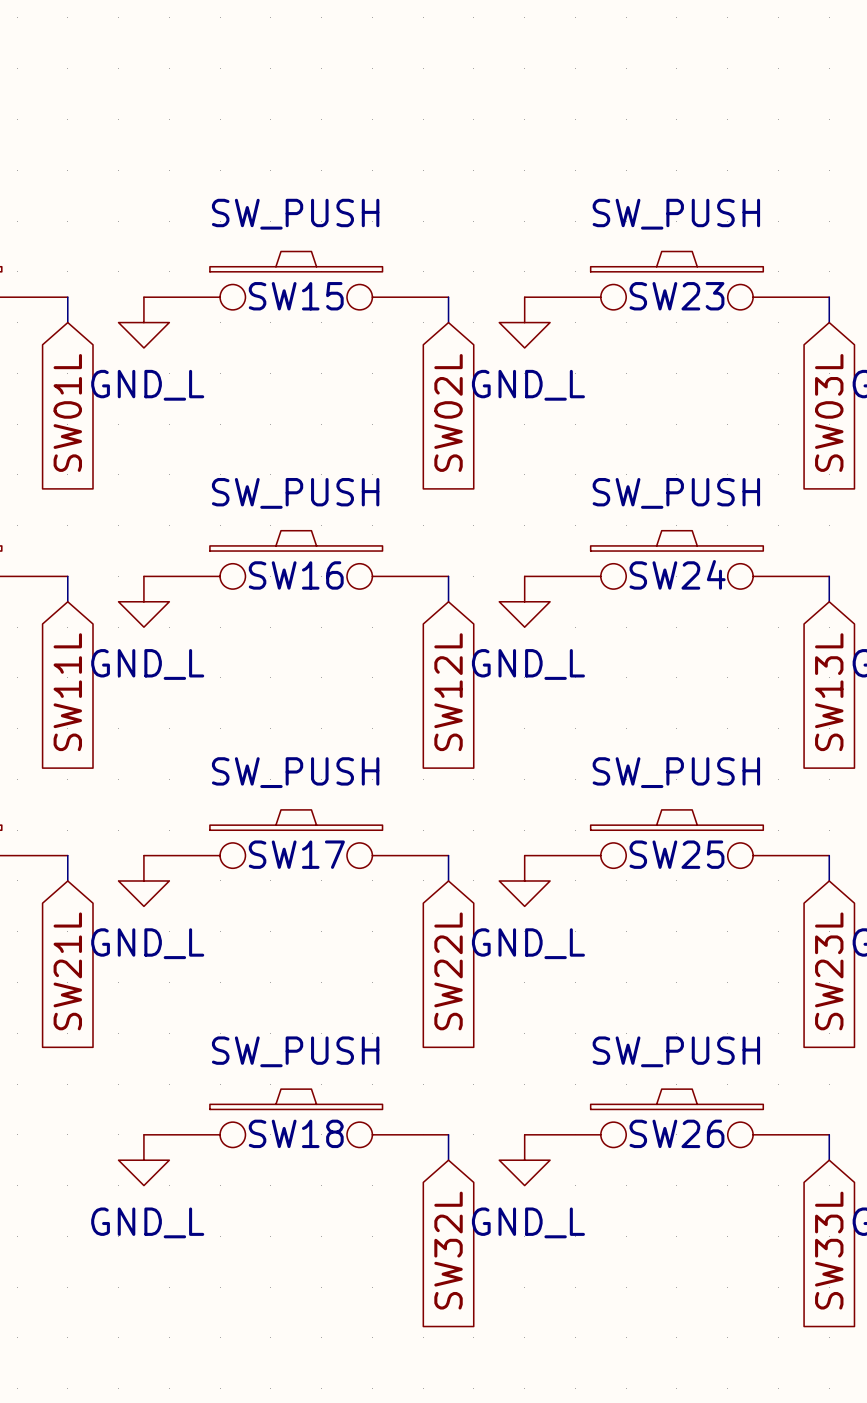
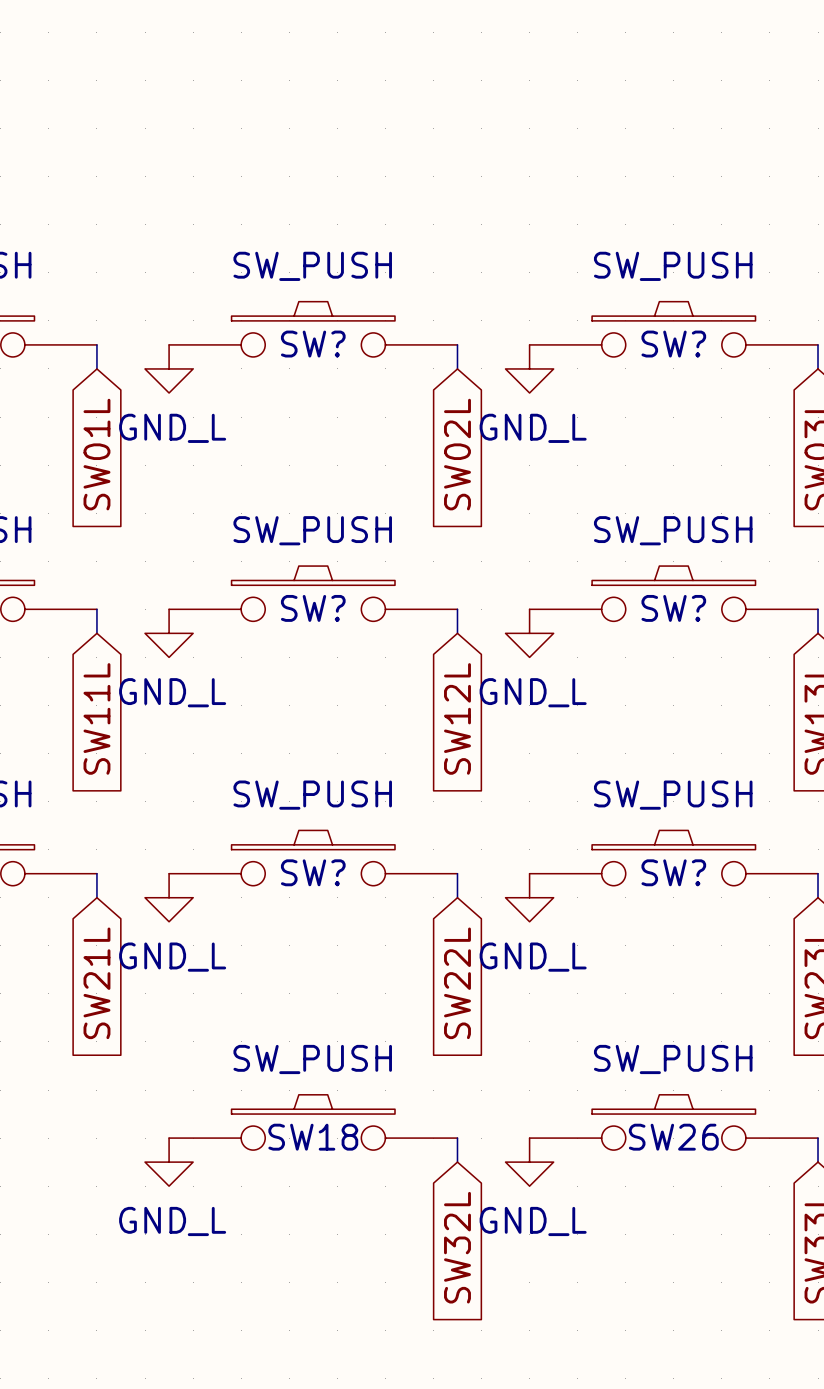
SW15 name: SW15 (296, 296) -> SW? (313, 344)
SW23 name: SW23 (676, 296) -> SW? (673, 344)
SW24 name: SW24 (677, 574) -> SW? (673, 608)
SW16 name: SW16 (296, 575) -> SW? (313, 608)
SW17 name: SW17 (296, 854) -> SW? (313, 872)
SW25 name: SW25 (676, 854) -> SW? (673, 872)

